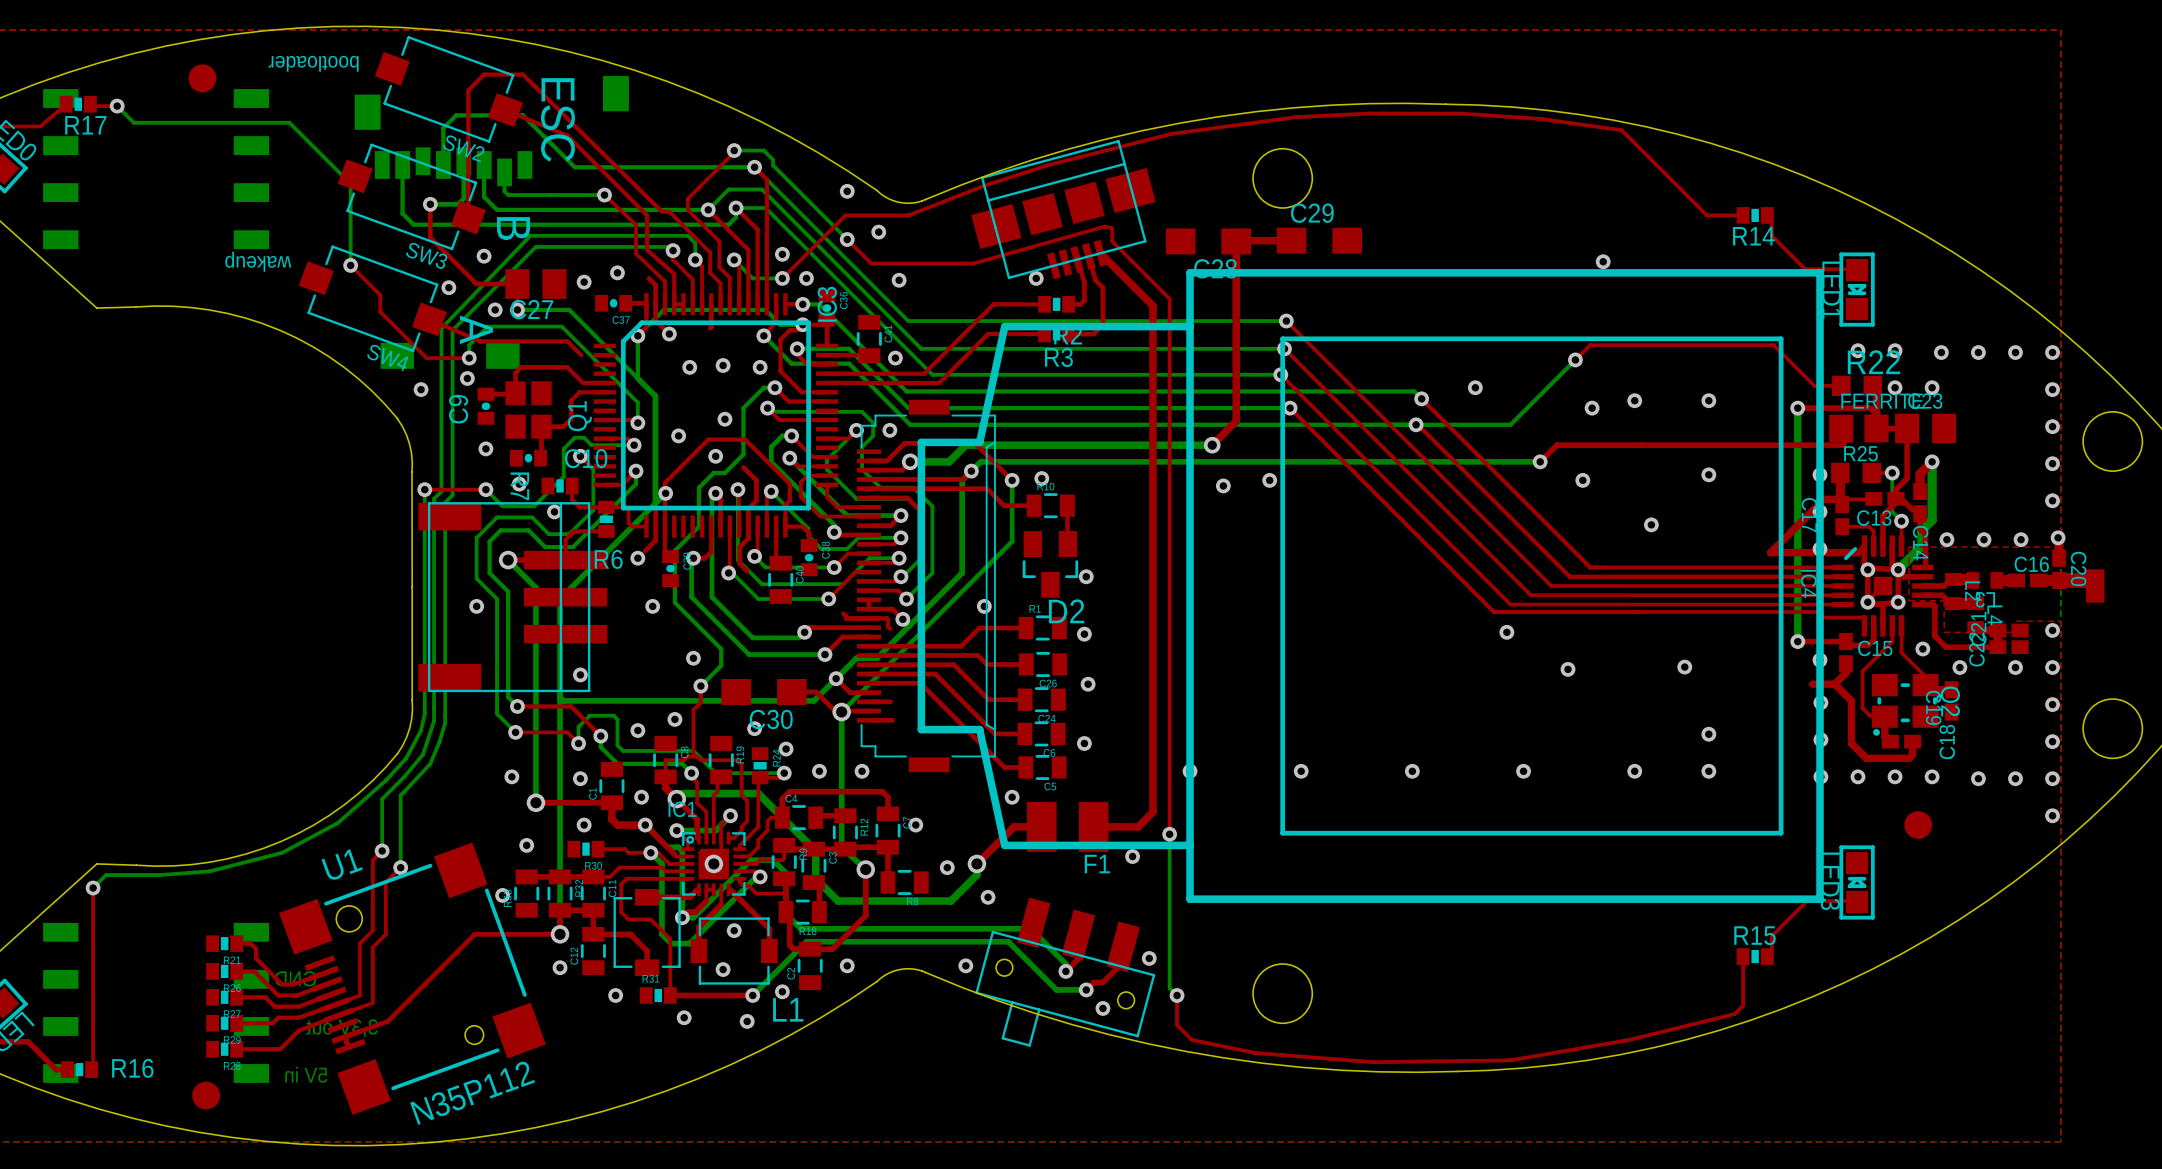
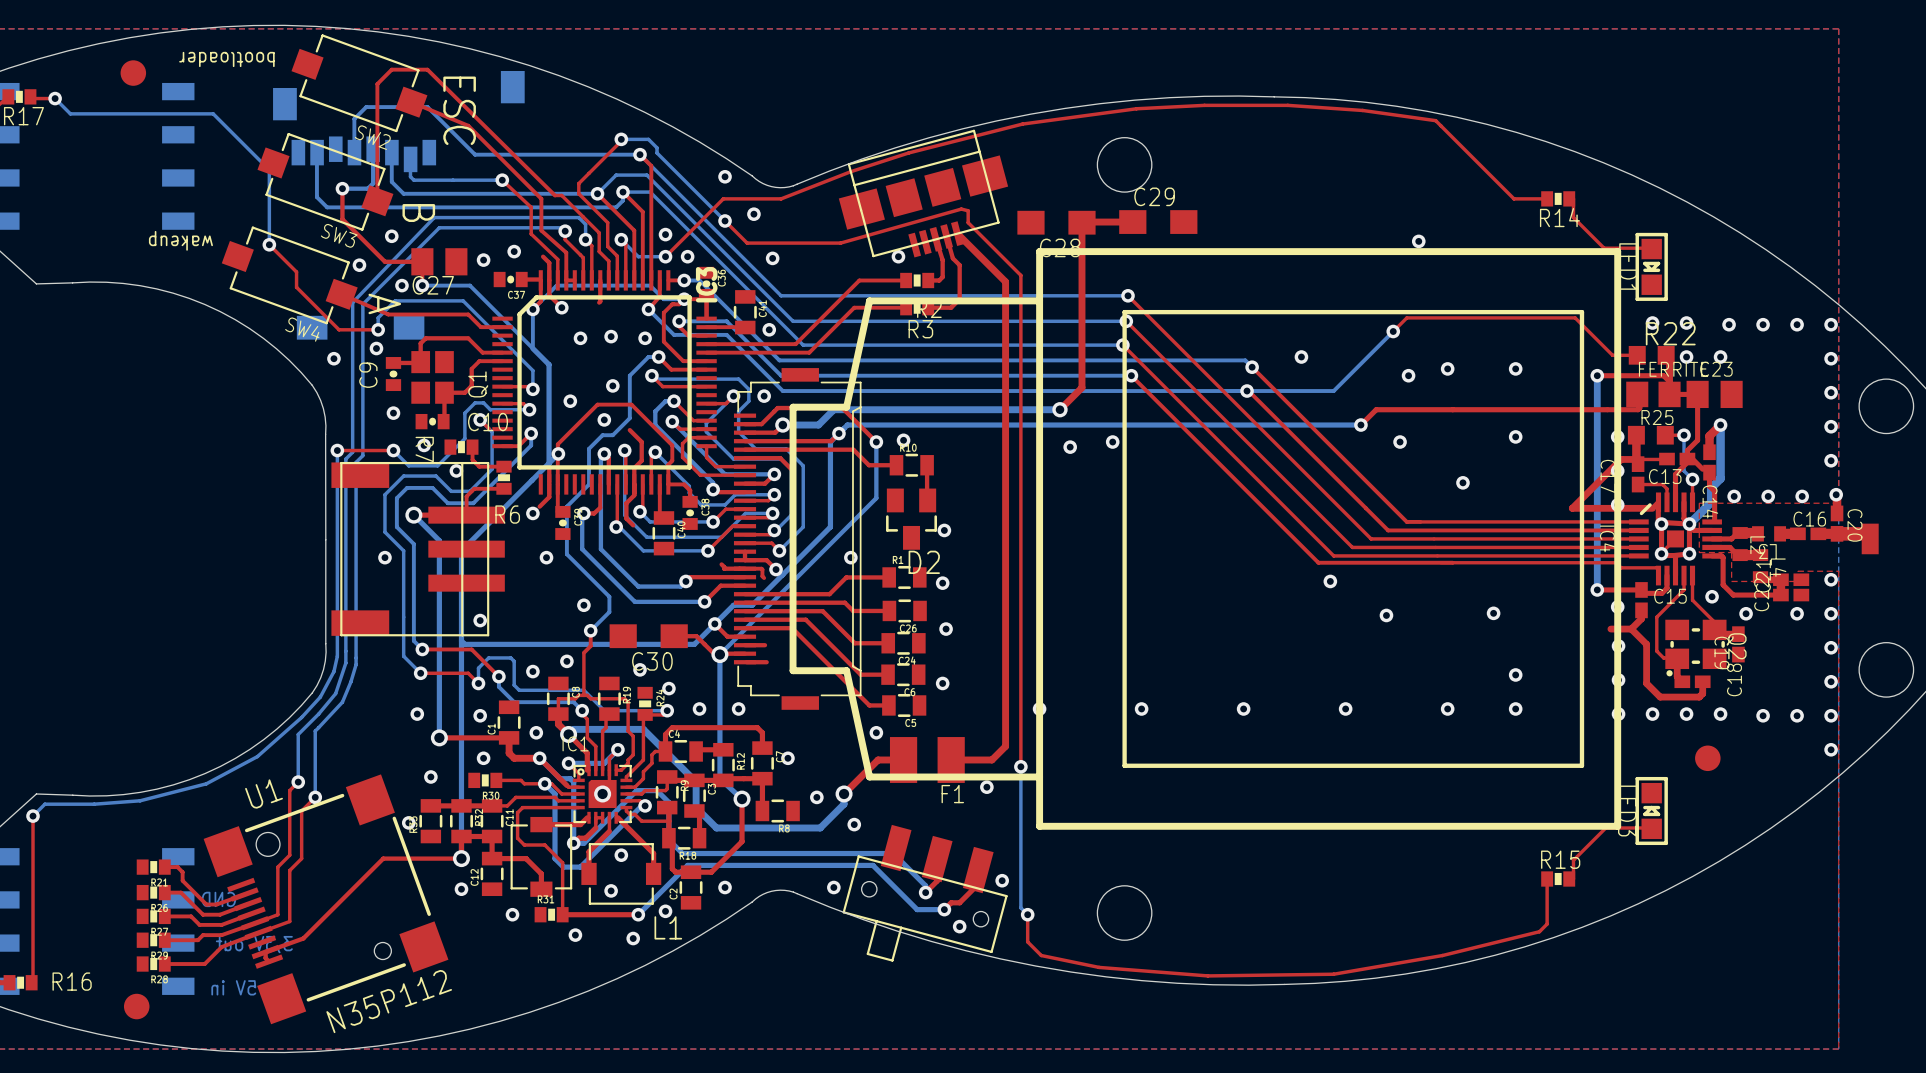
top track: none -> (480, 327) (502, 327)
top track: (606, 507) (625, 507) (628, 510) (628, 523) (632, 526) (646, 526) -> none

